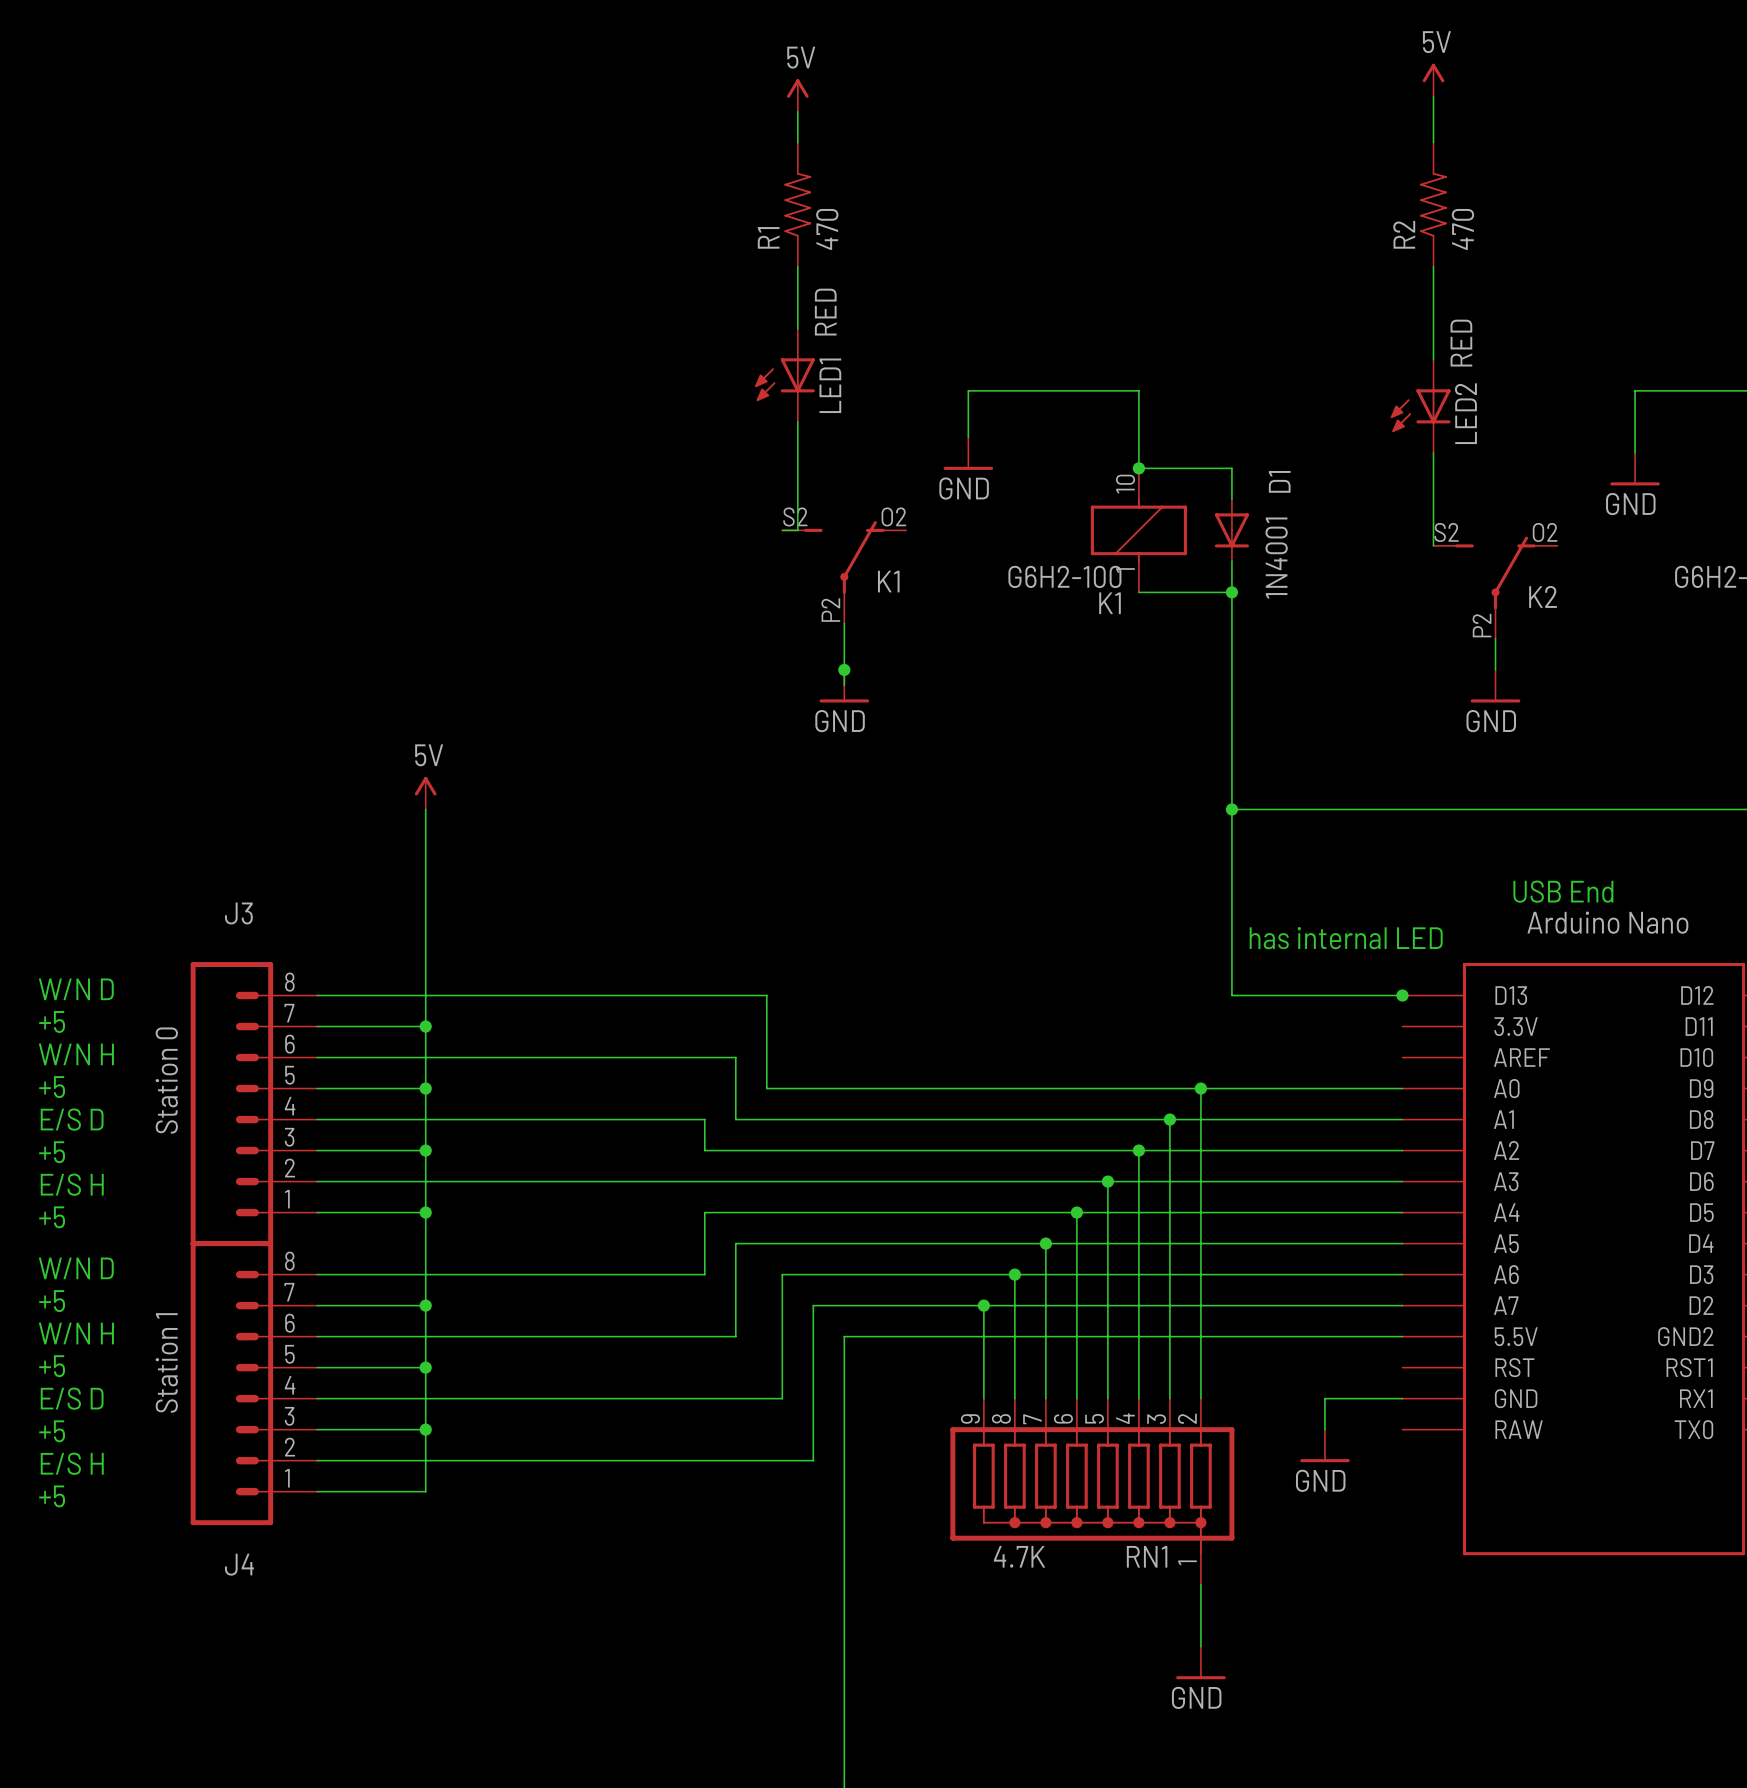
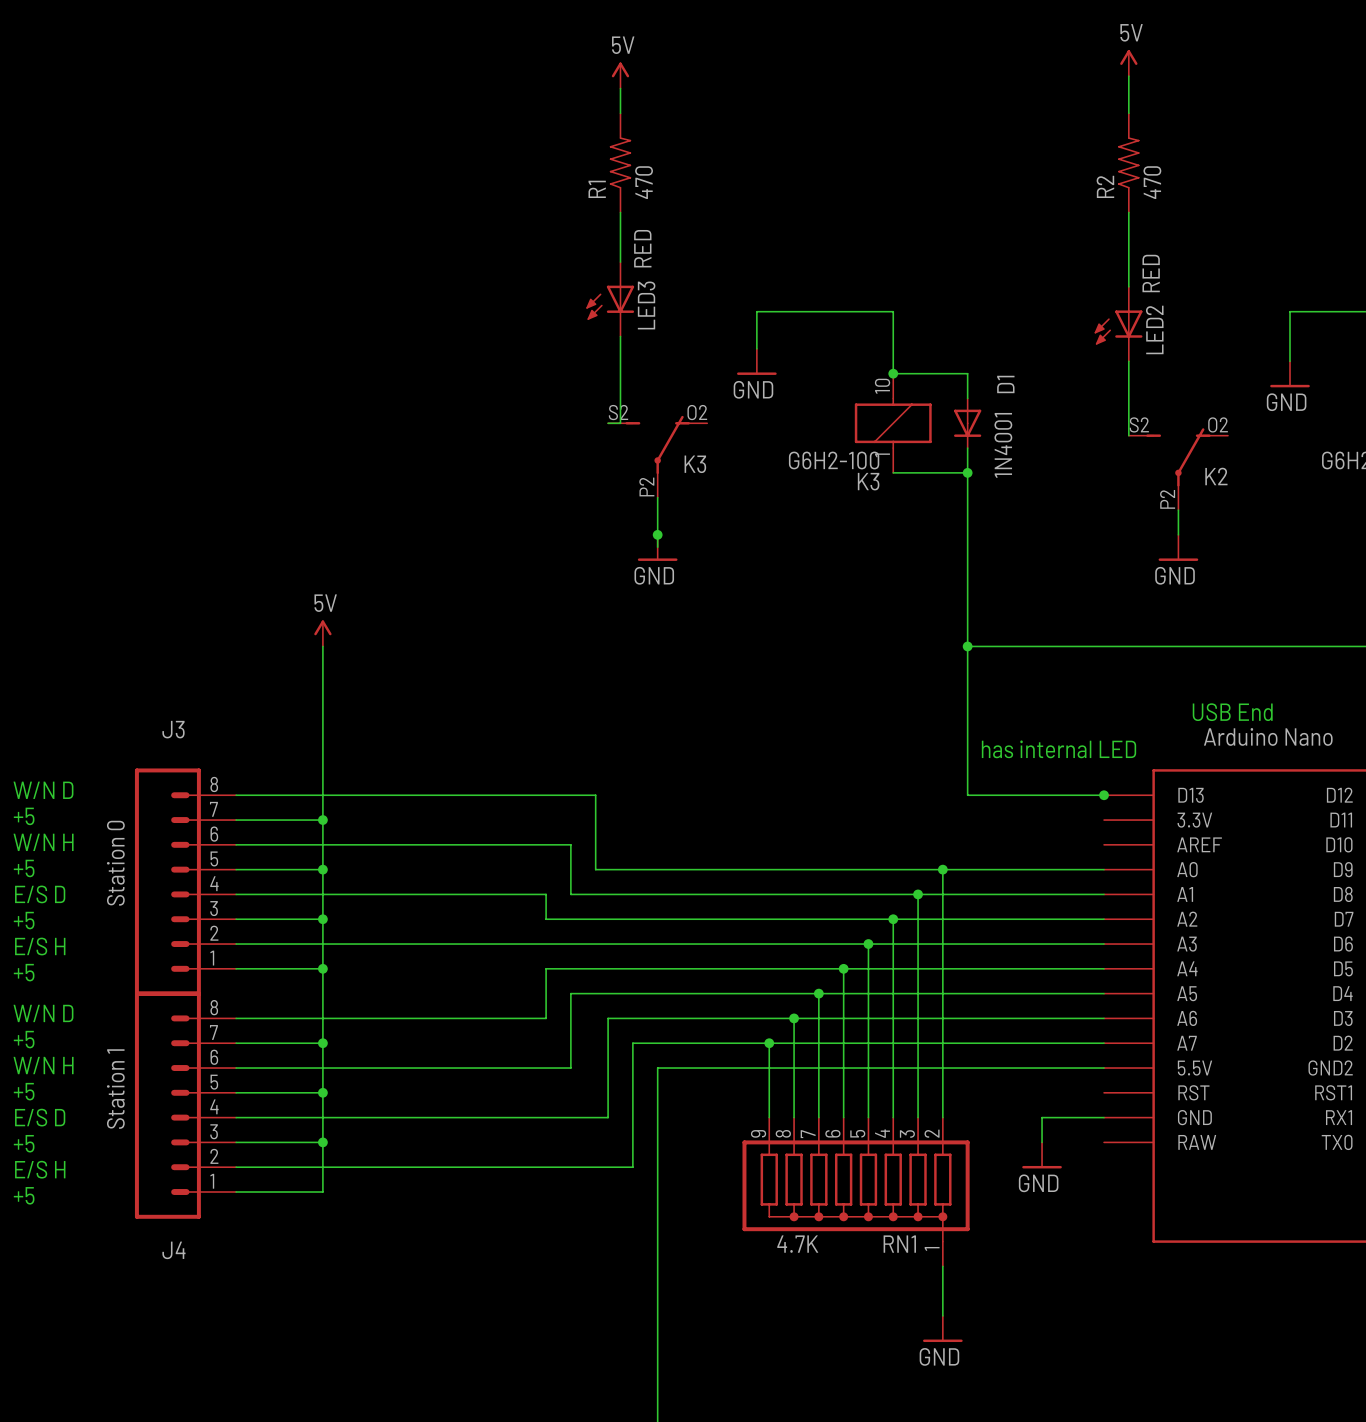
LED1 name: LED1 (830, 385) -> LED3 (646, 305)
K1 name: K1 (888, 581) -> K3 (695, 464)
K1 name: K1 (1110, 603) -> K3 (868, 481)

